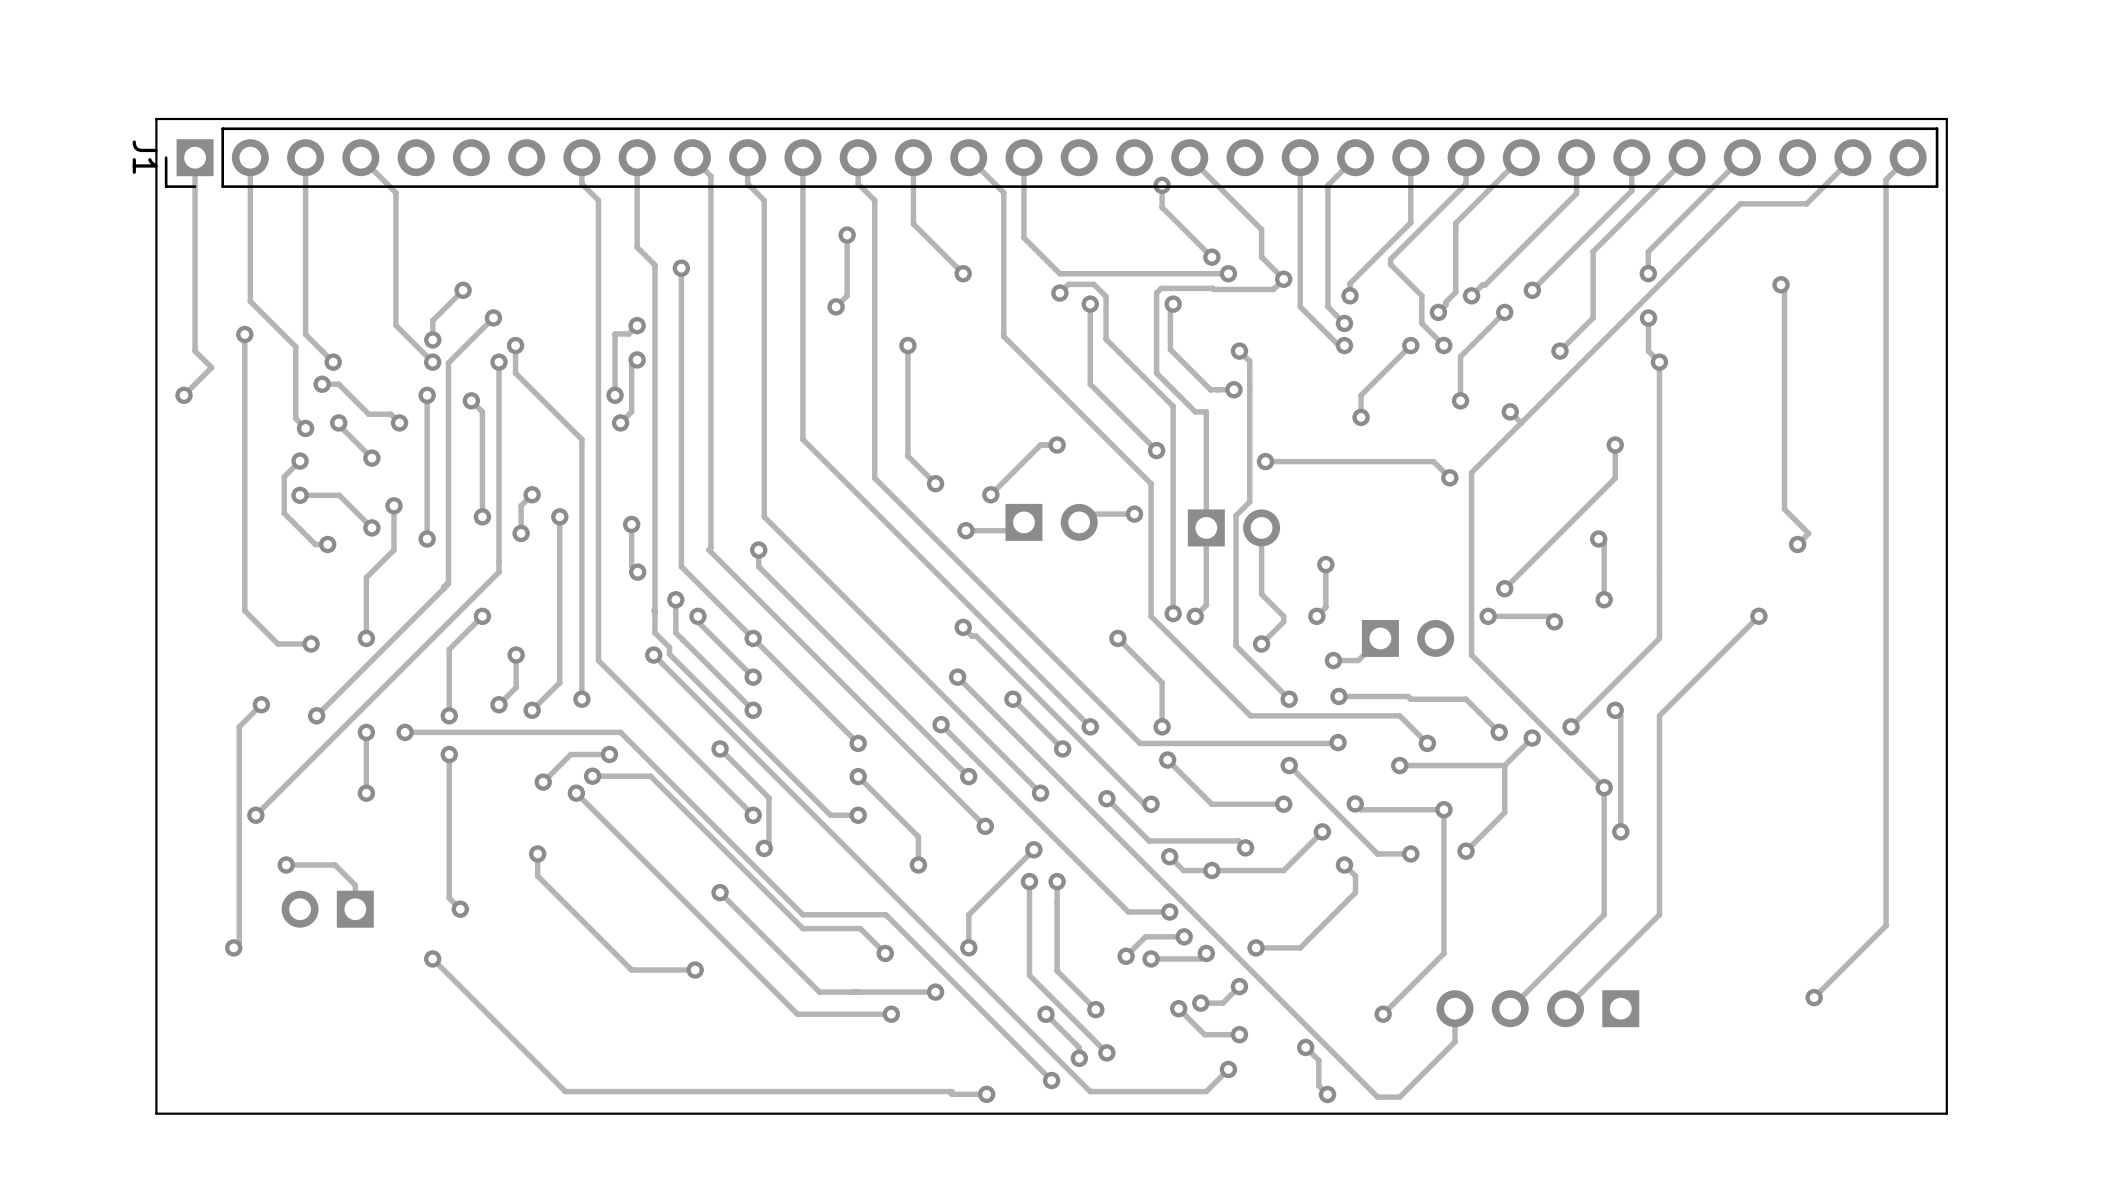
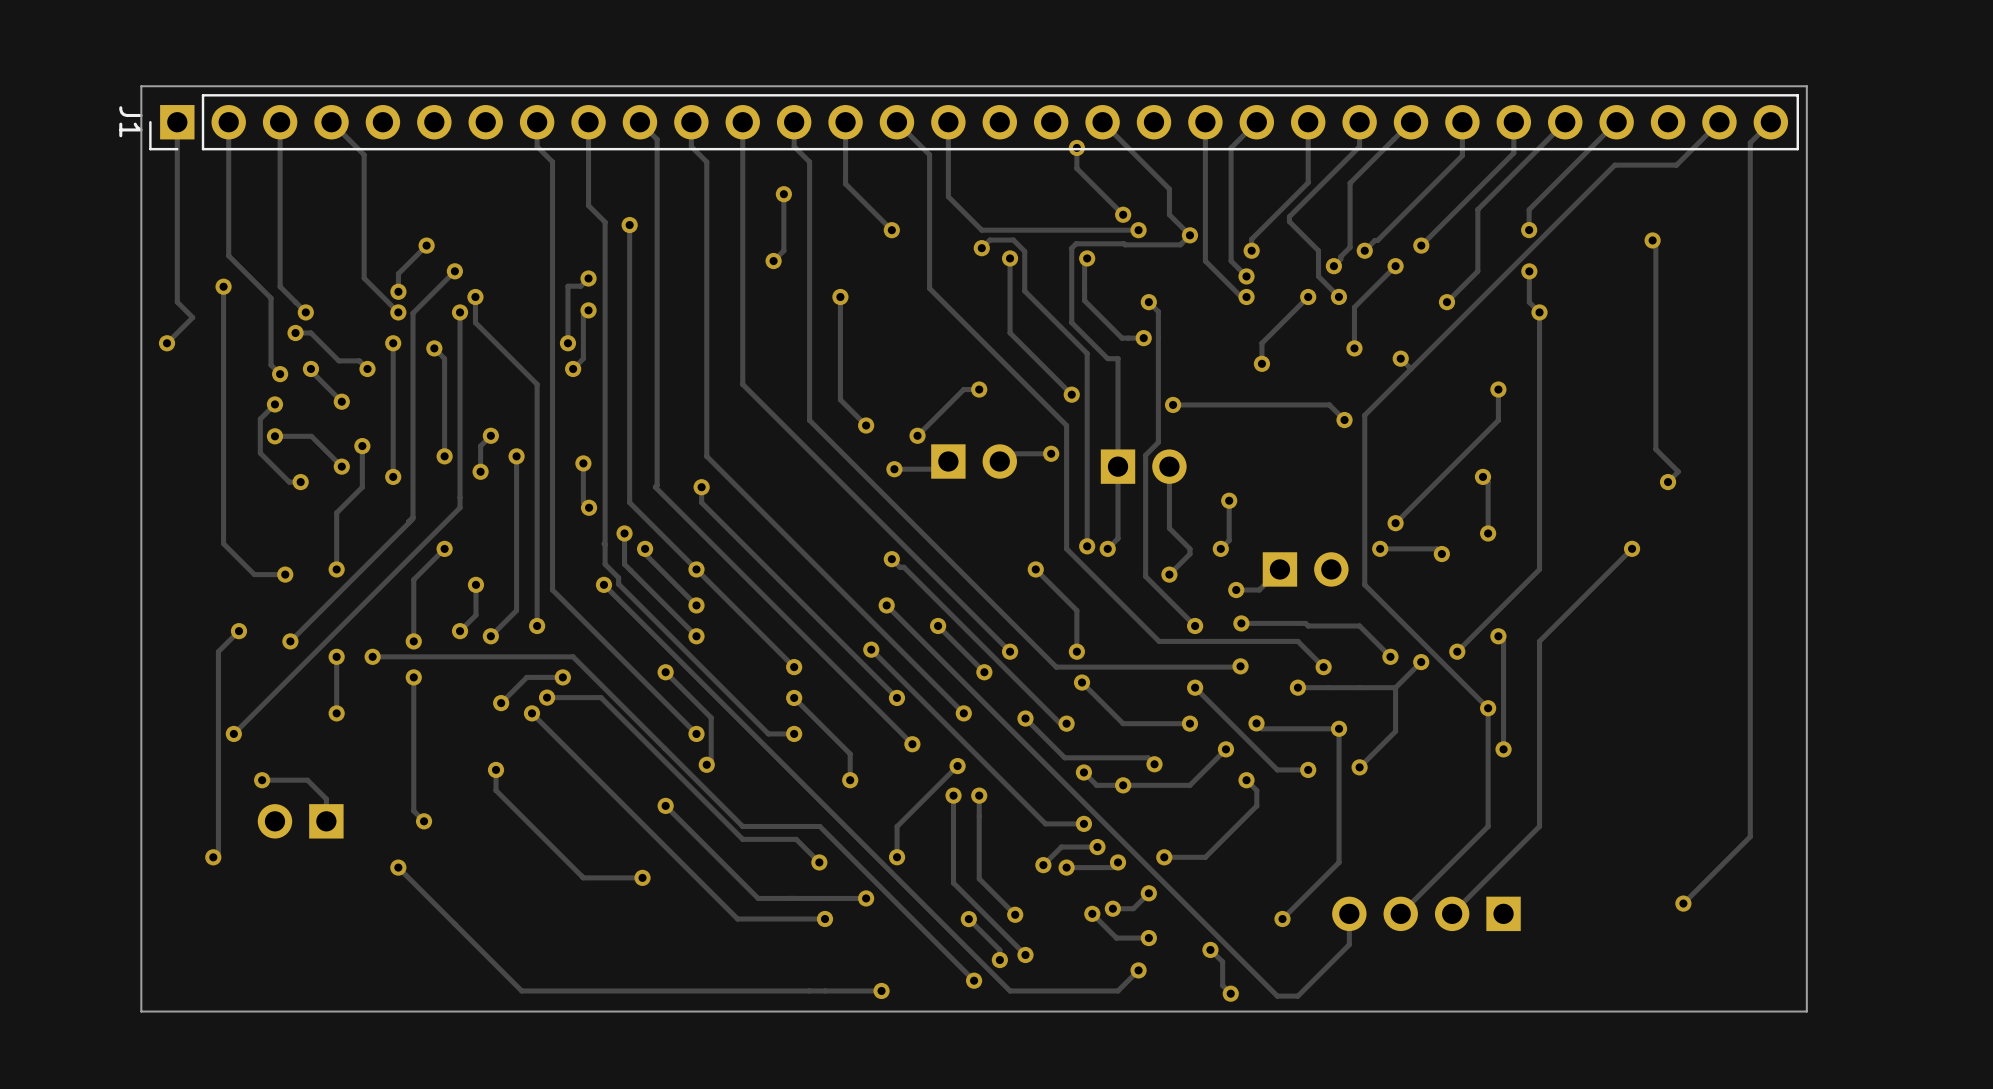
track: (949, 1091) (952, 1094) (986, 1094) -> none
via position: (986, 1094) -> (881, 990)

